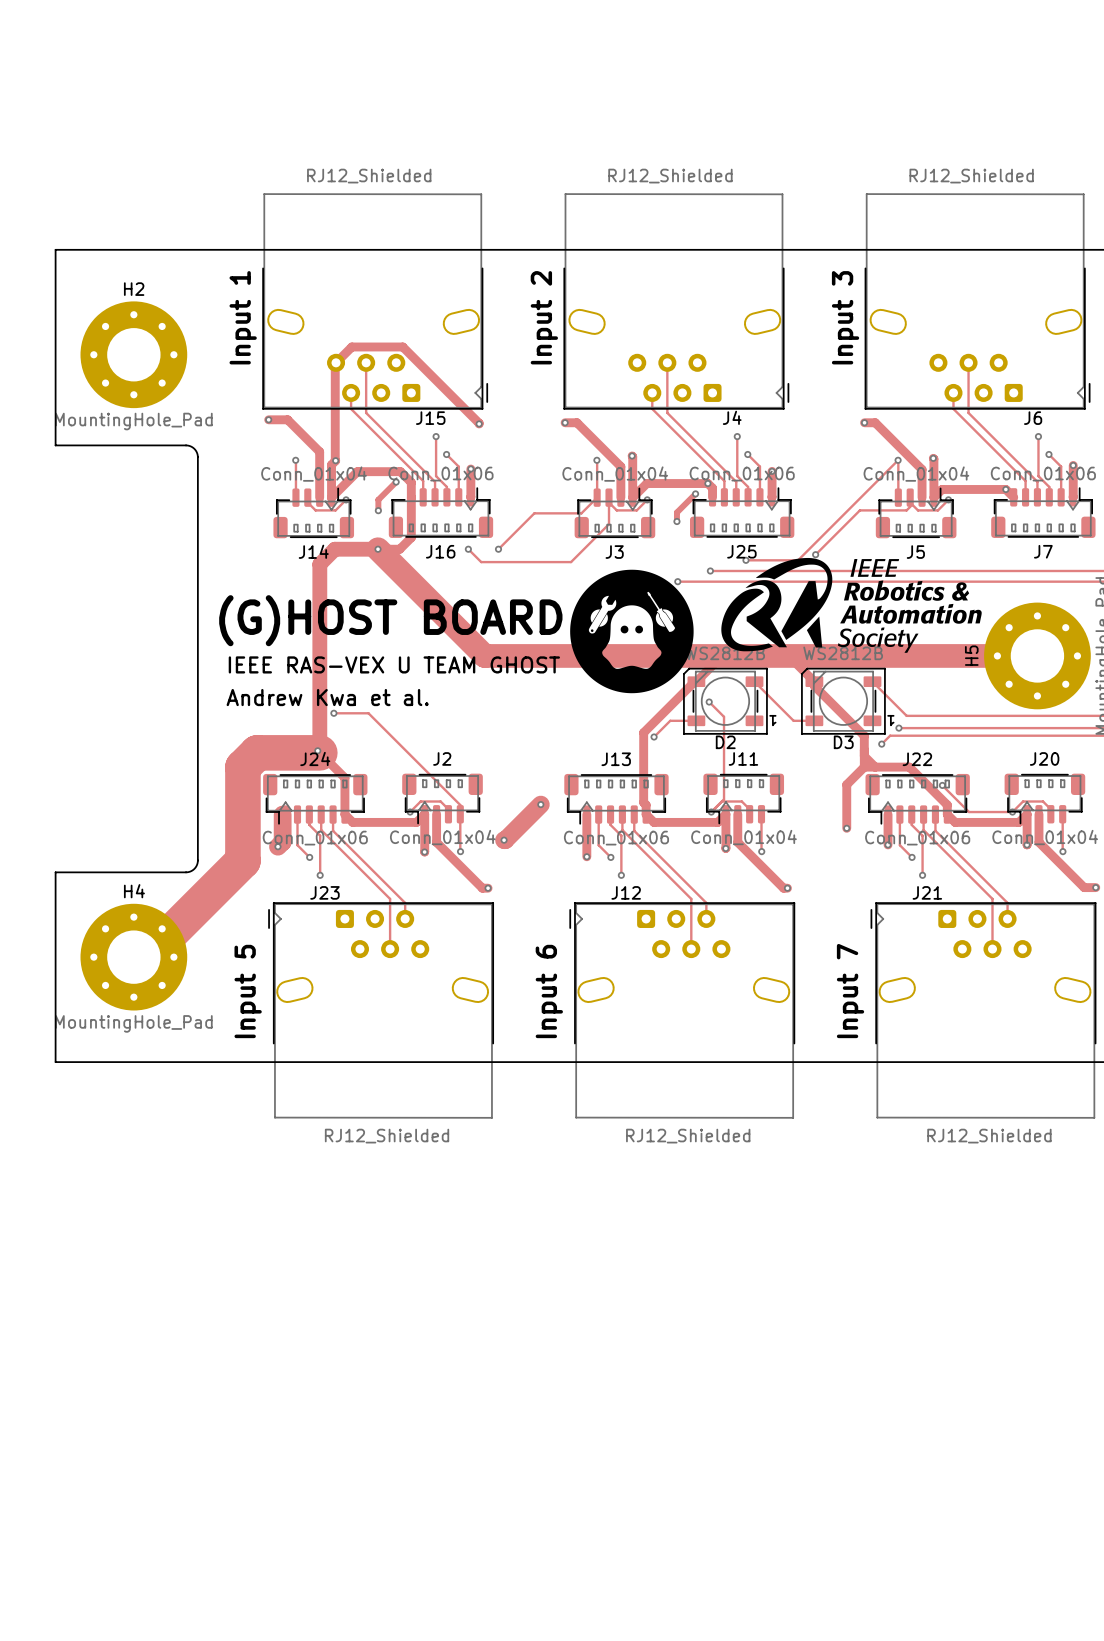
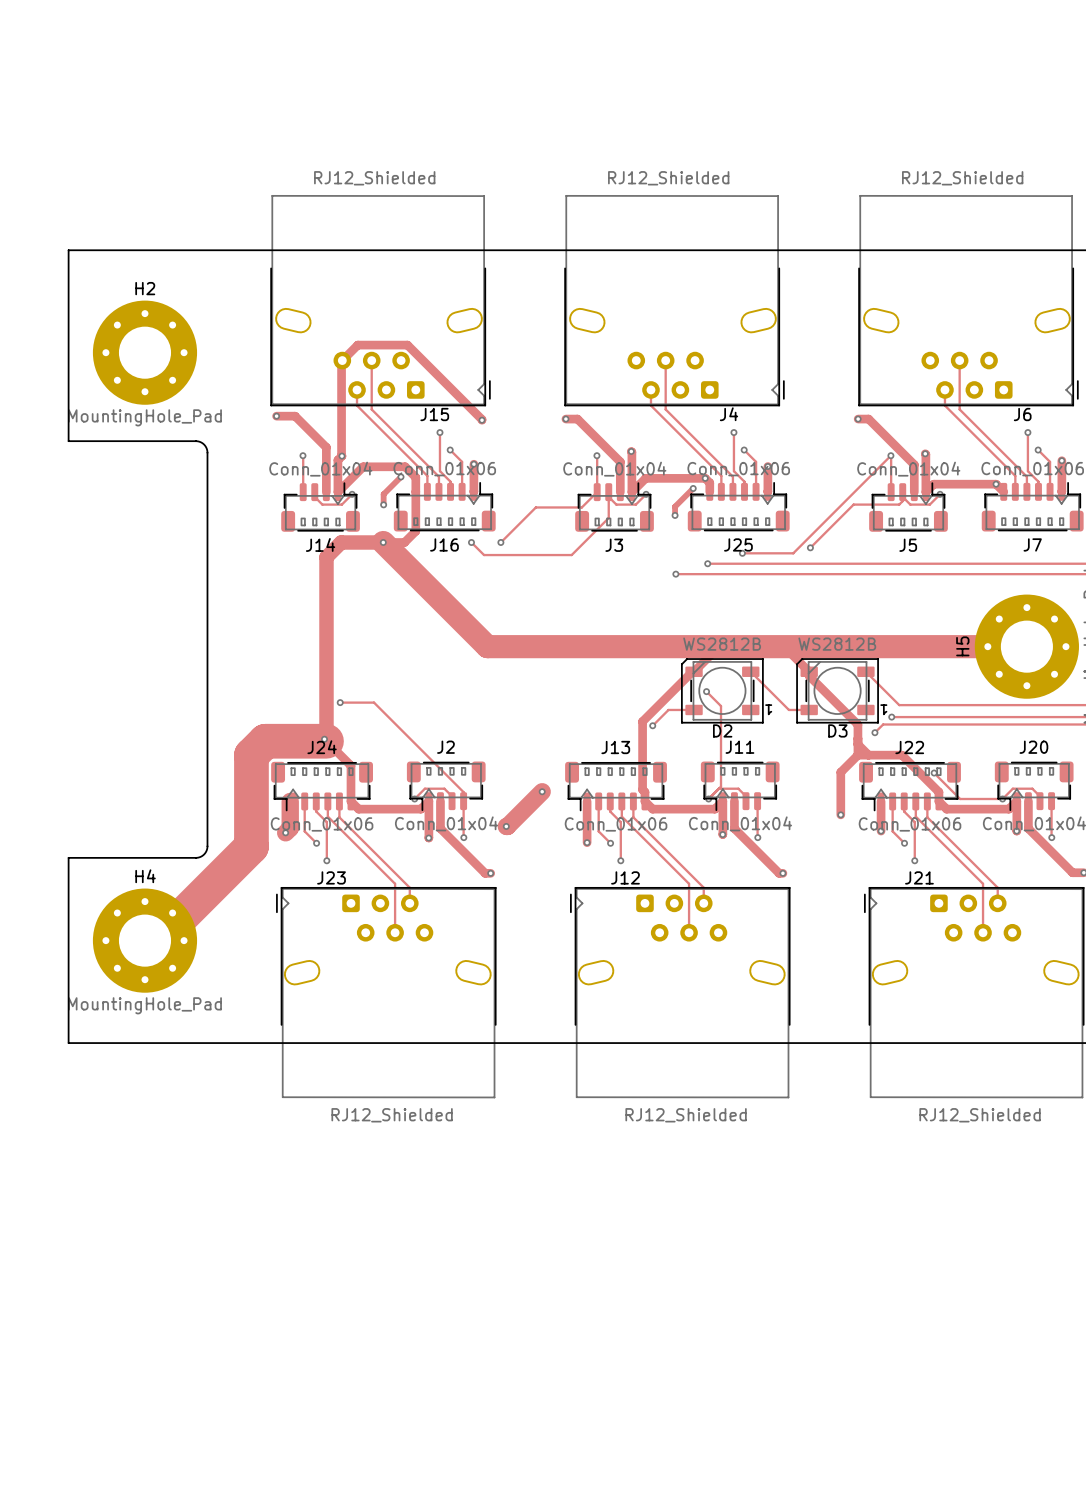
text: Input 1 (243, 317) -> none
text: Input 2 (544, 317) -> none
text: Input 3 (845, 317) -> none
drawing: [721, 557, 982, 653] -> none
drawing: [570, 569, 694, 694] -> none
text: (G)HOST BOARD (390, 620) -> none
text: IEEE RAS-VEX U TEAM GHOST (394, 664) -> none
text: Andrew Kwa et al. (327, 697) -> none
text: Input 5 (248, 991) -> none
text: Input 6 (549, 991) -> none
text: Input 7 (850, 991) -> none

